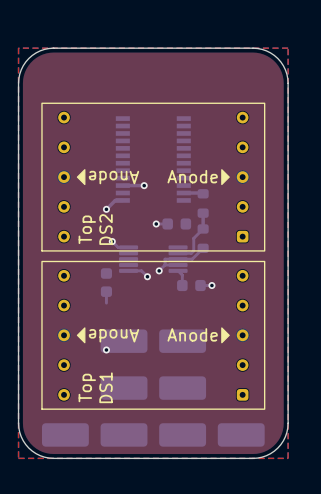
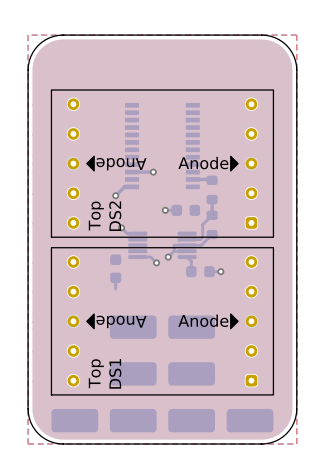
via: (106, 349) -> none

